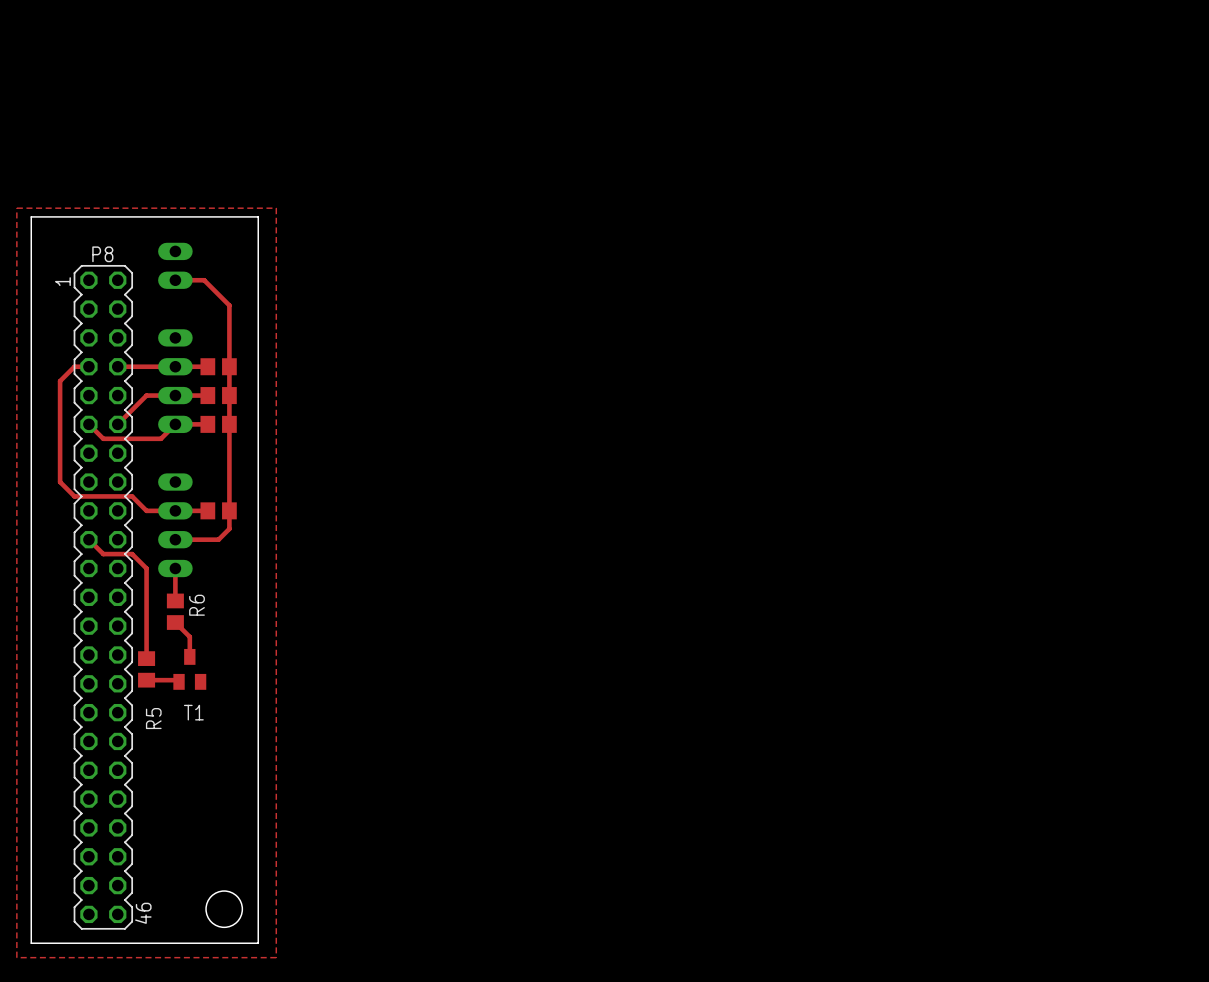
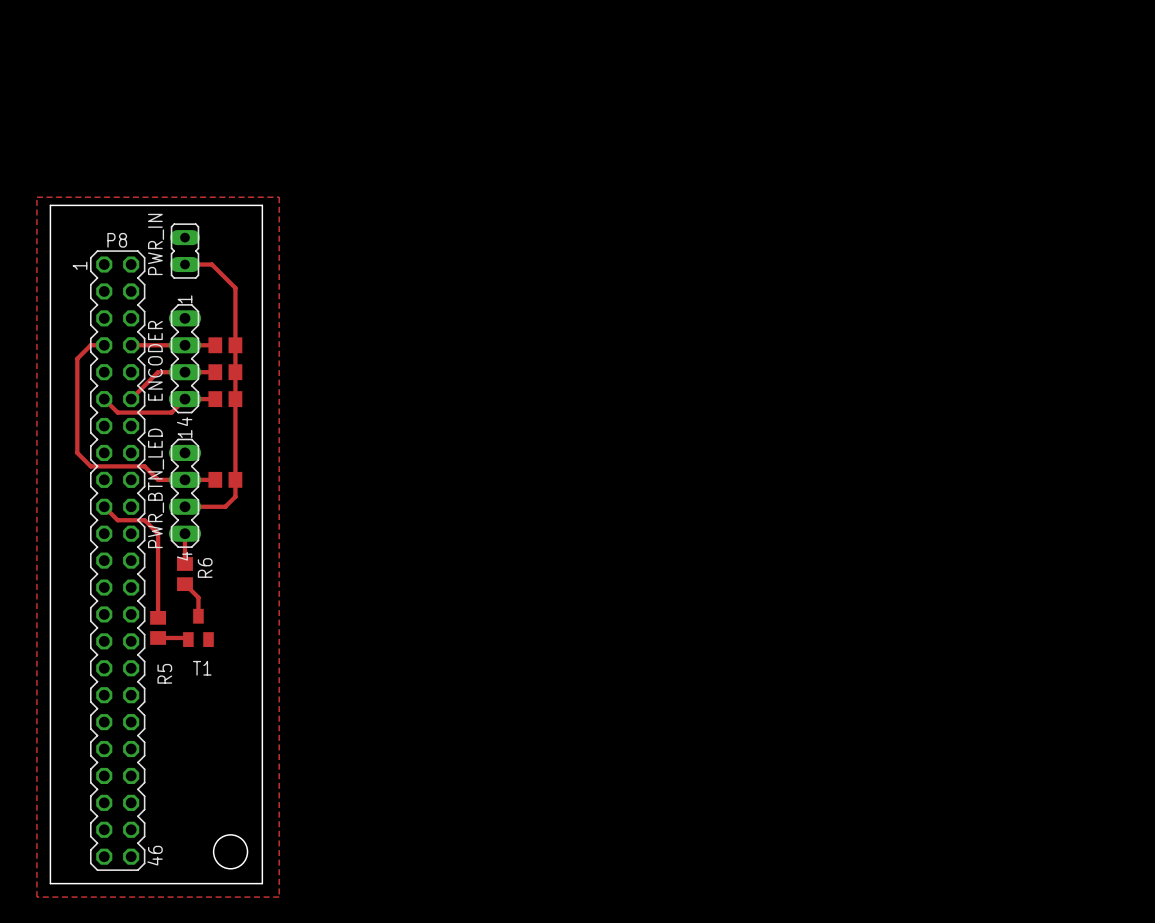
part: (175, 265) -> none
PWR_IN: none -> (185, 251)
ENCODER side: bottom (175, 381) -> top (185, 358)
part: (175, 525) -> none
PWR_BTN_LED: none -> (185, 493)

